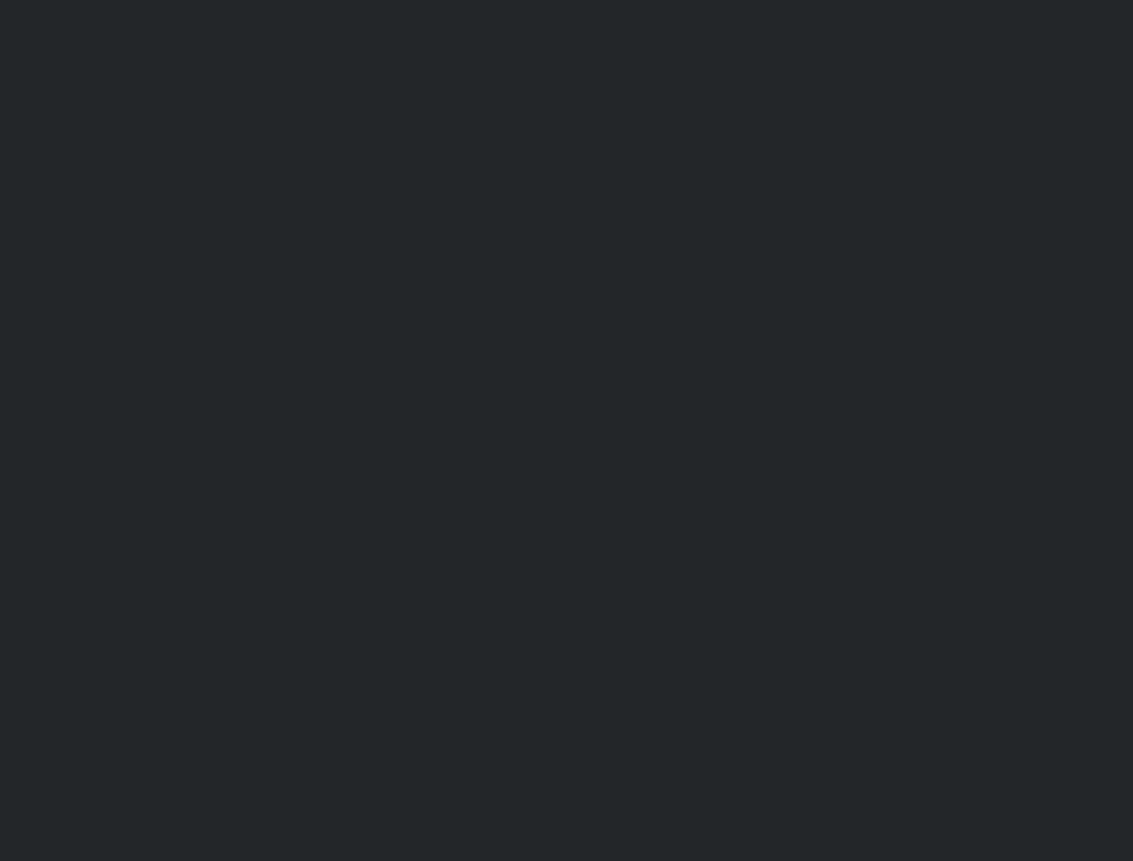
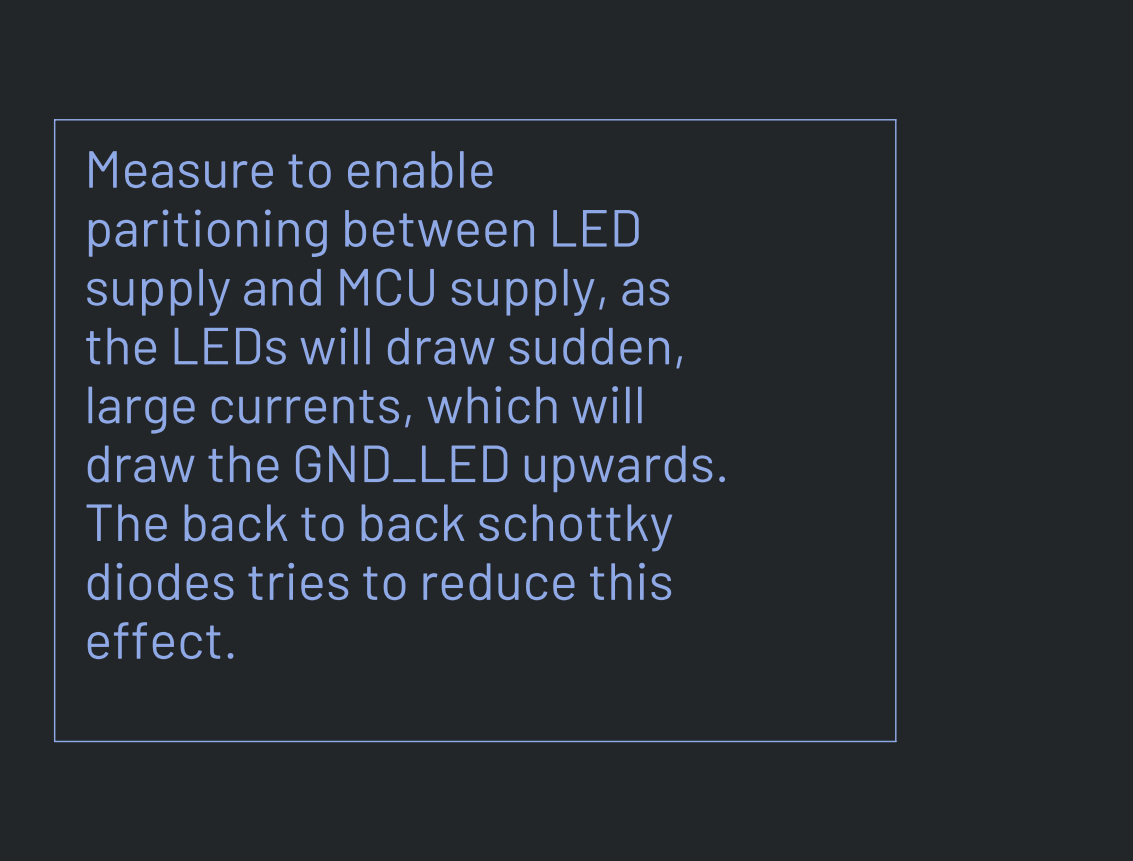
line: none -> (54, 119) (895, 119) (895, 741) (54, 741) (54, 119)
text: none -> Measure to enable (290, 169)
text: none -> paritioning between LED (363, 233)
text: none -> supply and MCU supply, as (378, 292)
text: none -> the LEDs will draw sudden, (384, 347)
text: none -> large currents, which will (365, 409)
text: none -> draw the GND_LED upwards. (406, 468)
text: none -> The back to back schottky (379, 527)
text: none -> diodes tries to reduce this (379, 581)
text: none -> effect. (160, 640)

